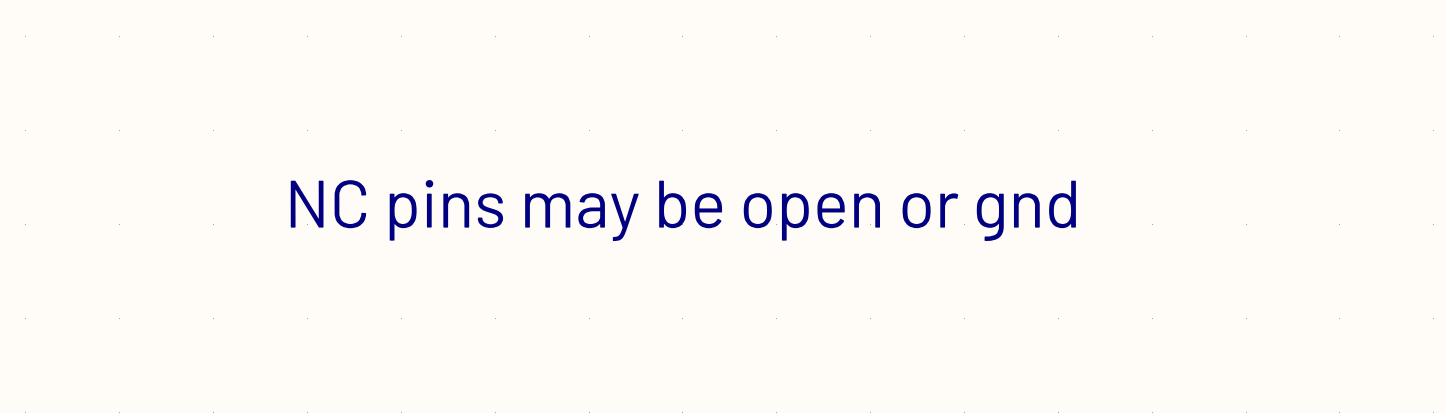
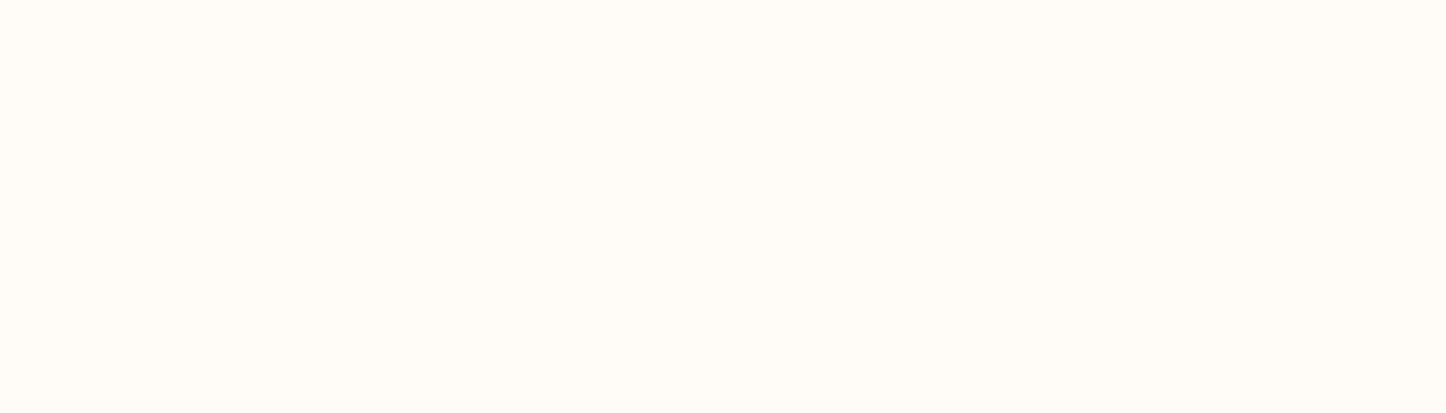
text: NC pins may be open or gnd (683, 210) -> none

